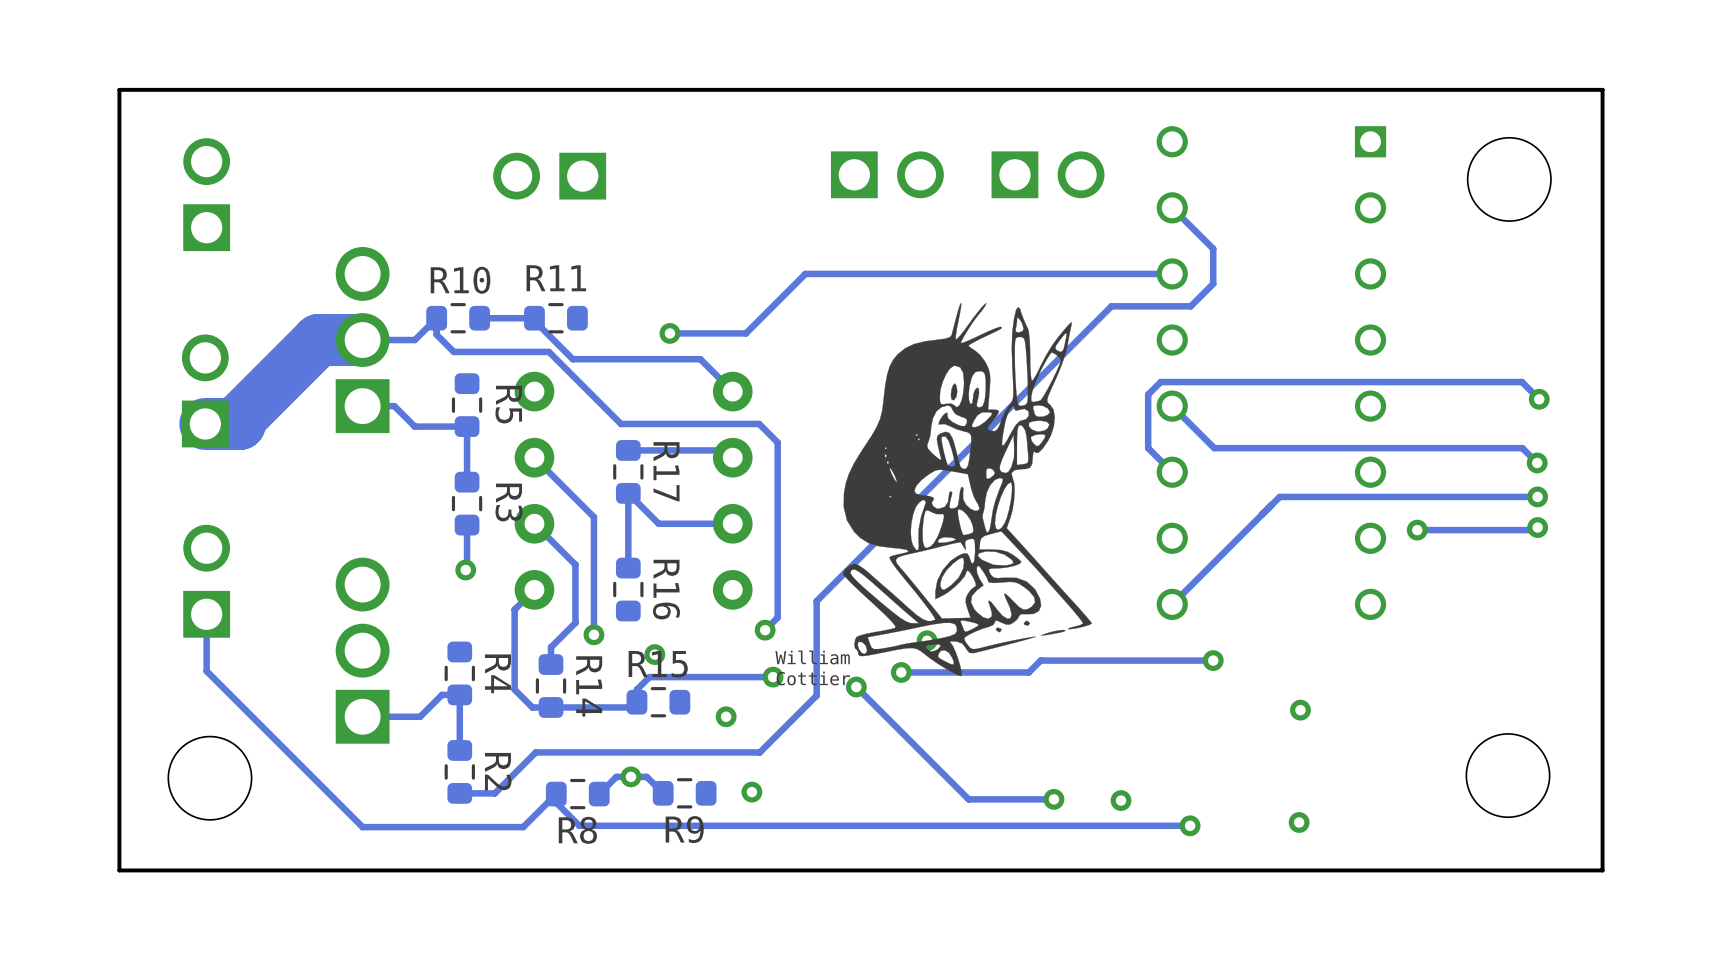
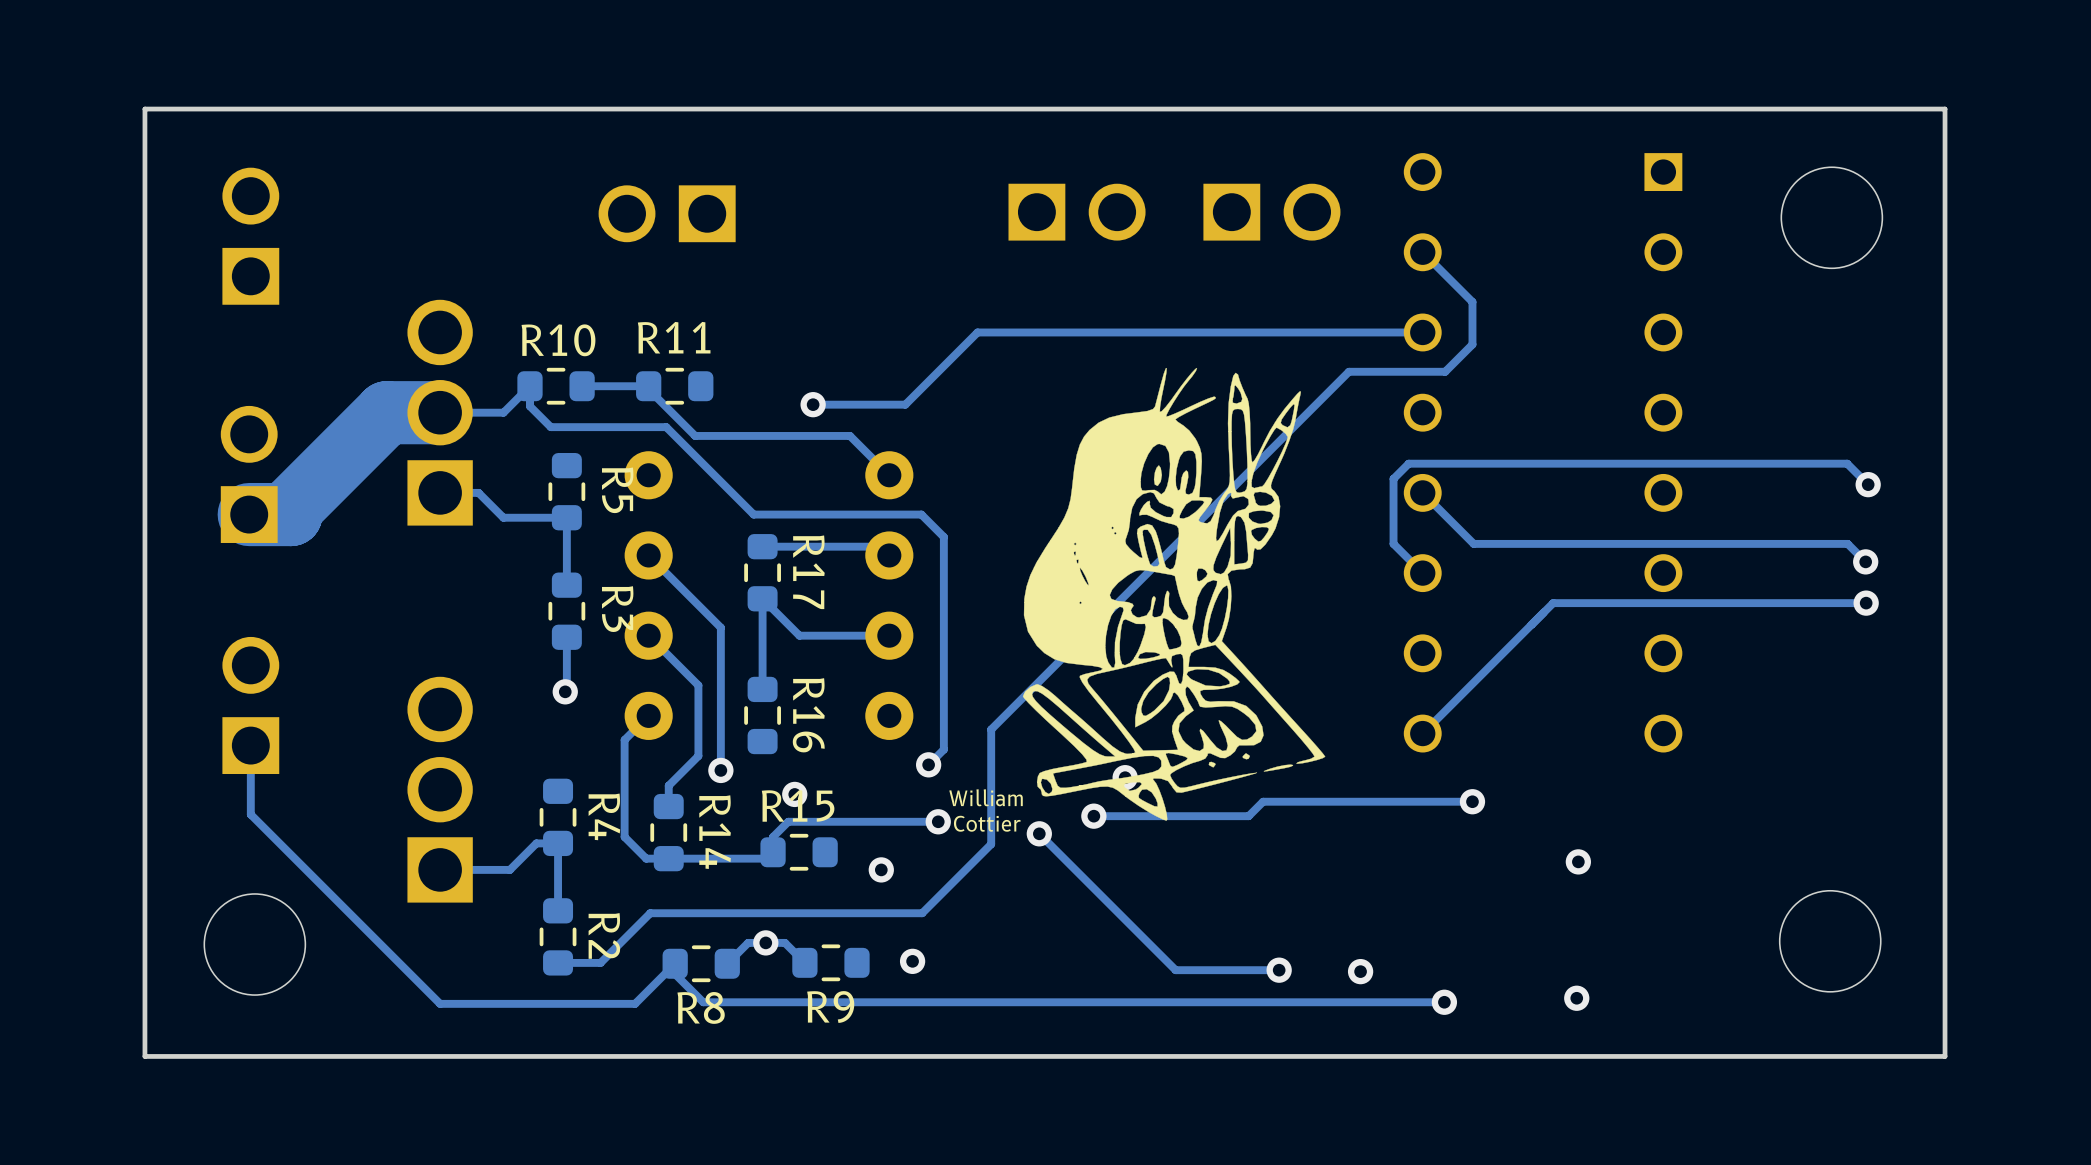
track: (1537, 527) (1535, 530) (1417, 530) -> none
via: (1537, 527) -> none
via: (1417, 530) -> none

